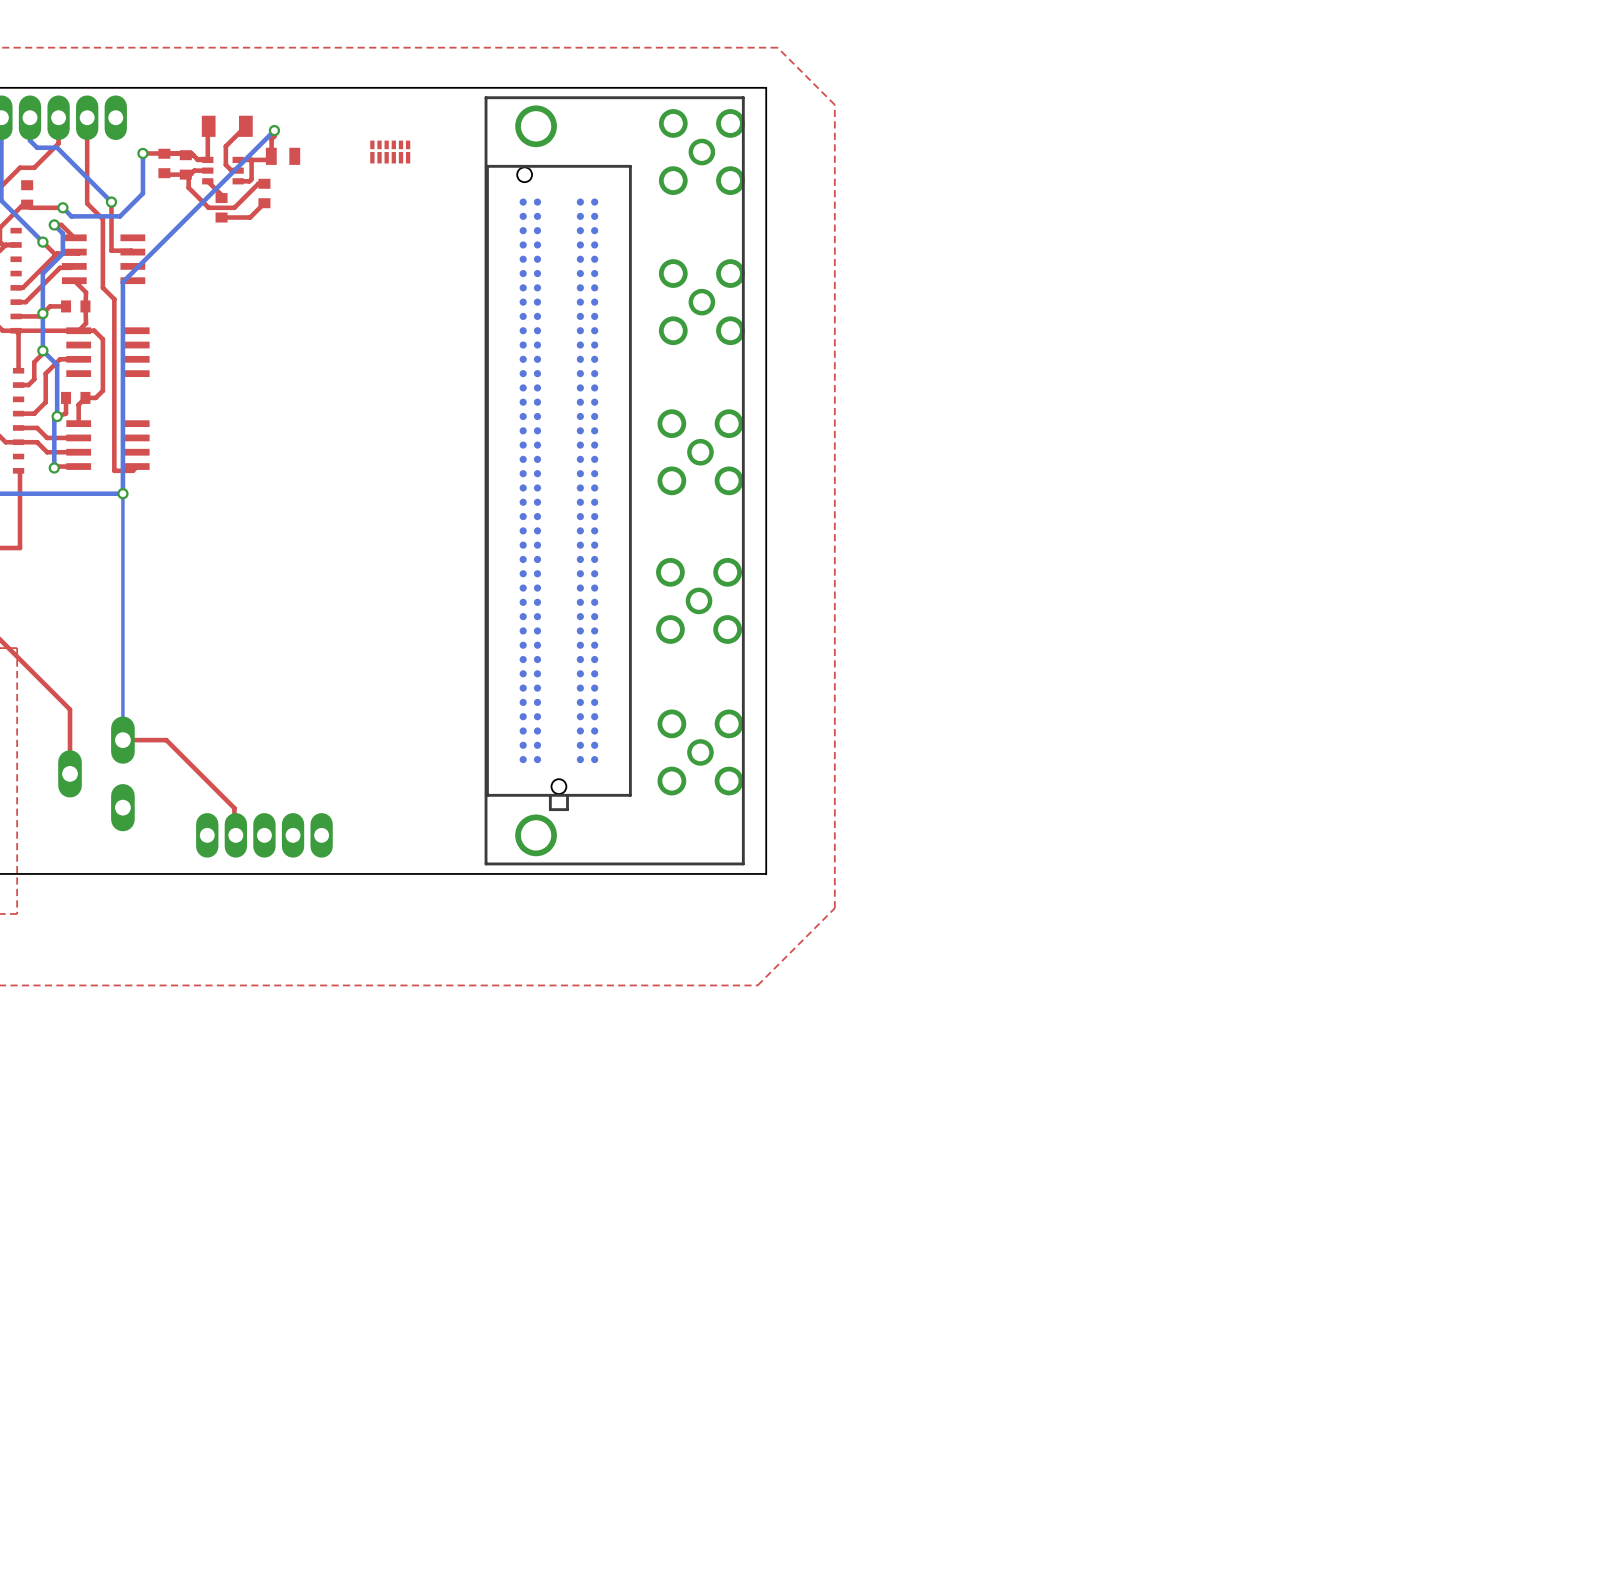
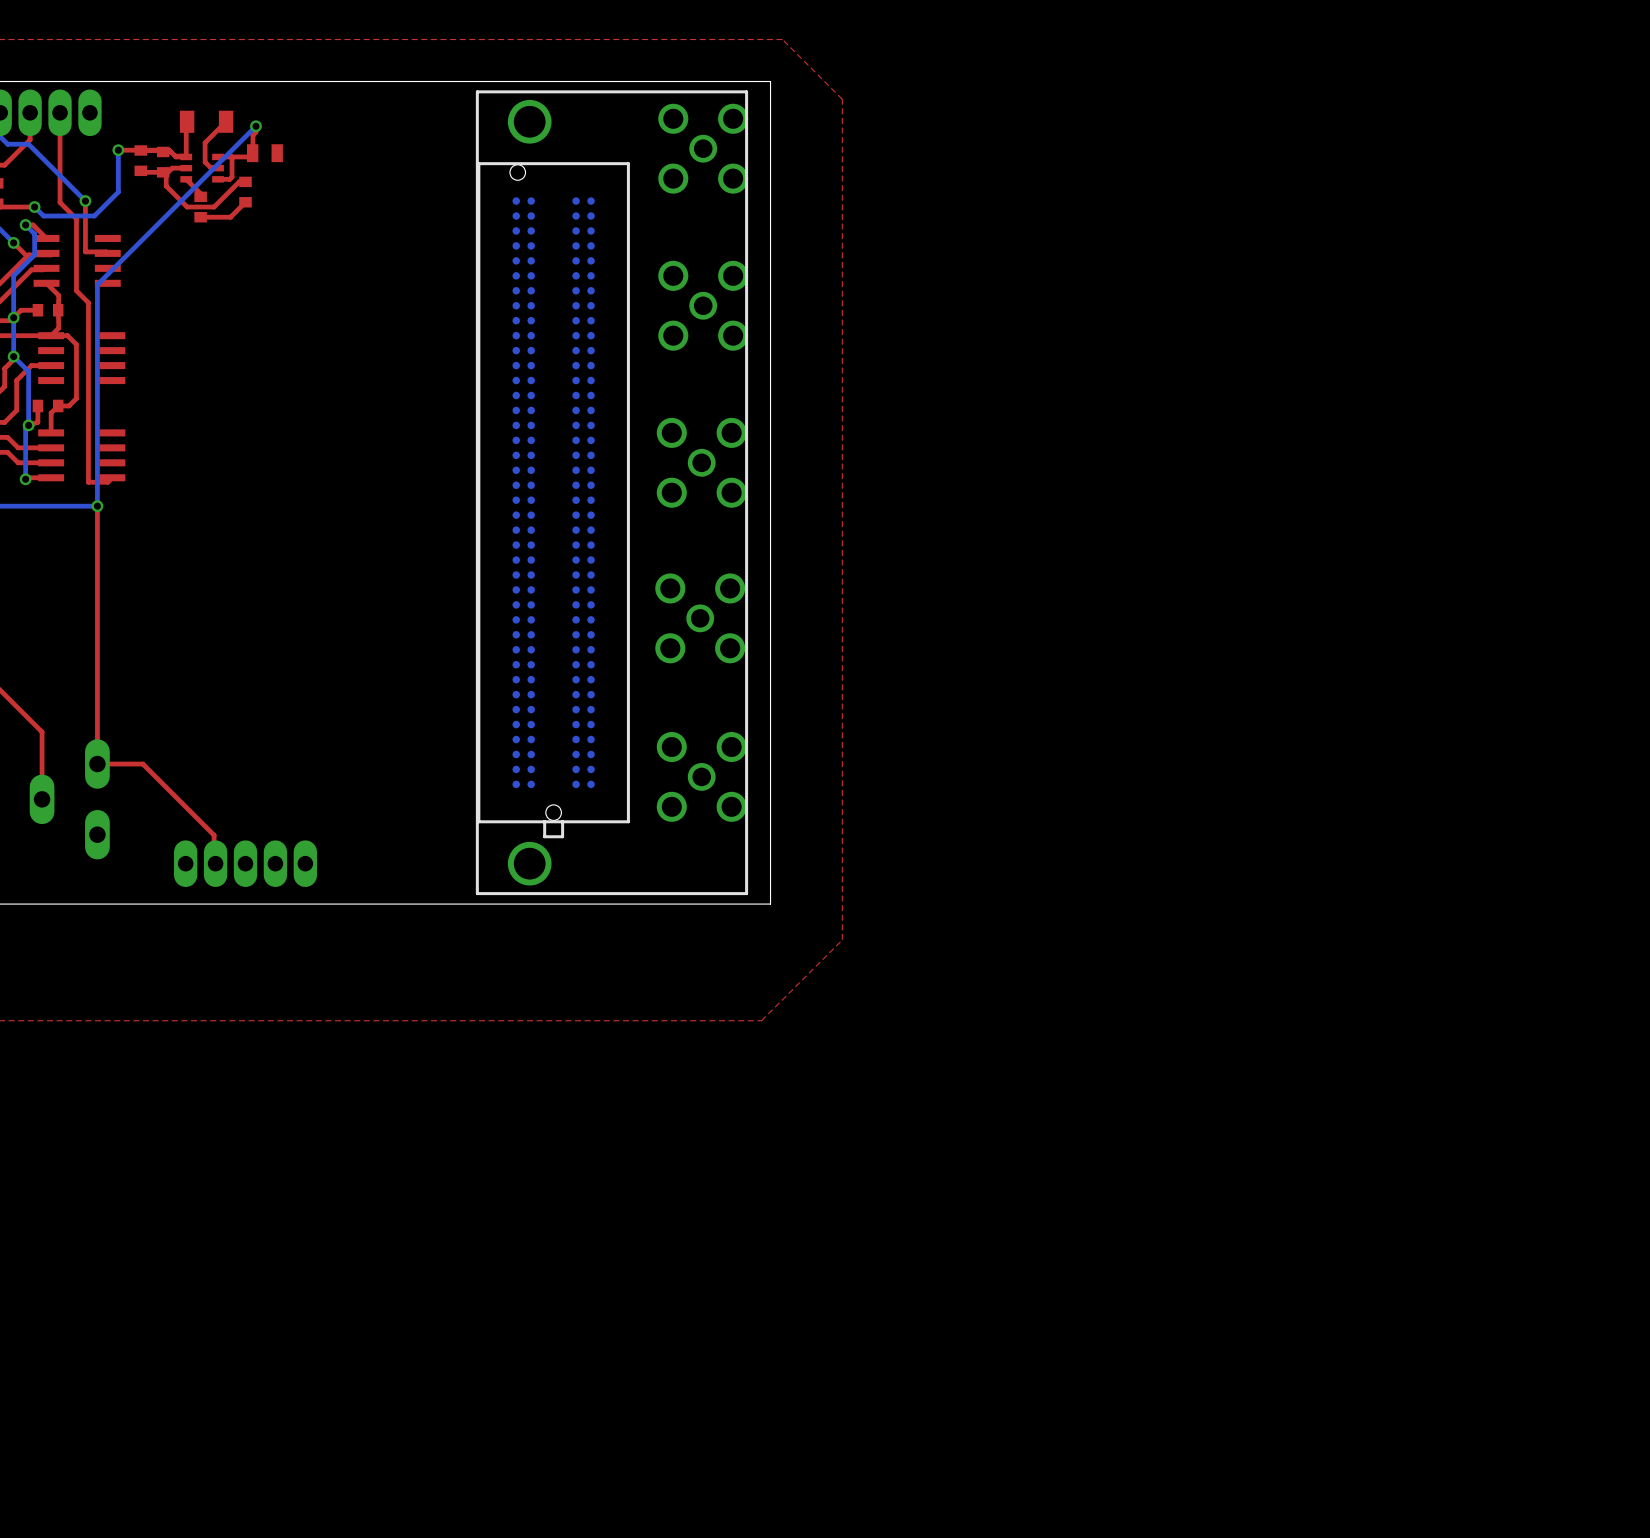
part: (390, 152) -> none
top track: none -> (97, 506) (97, 764)
bottom track: (122, 493) (122, 740) -> none

